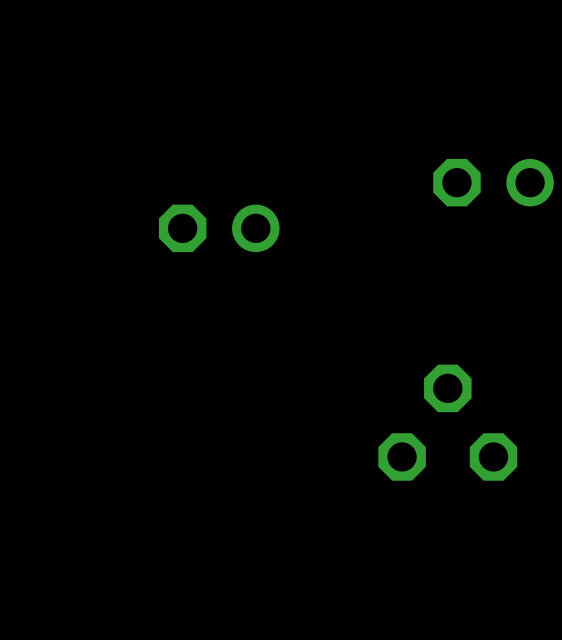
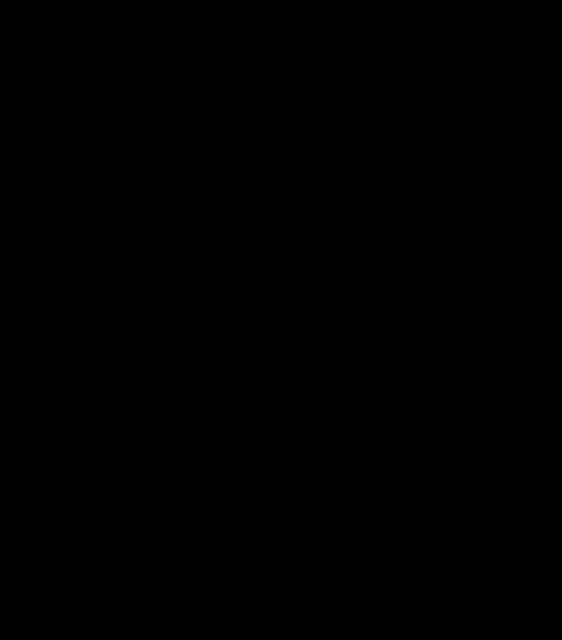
part: (493, 182) -> none
part: (219, 228) -> none
part: (447, 422) -> none

